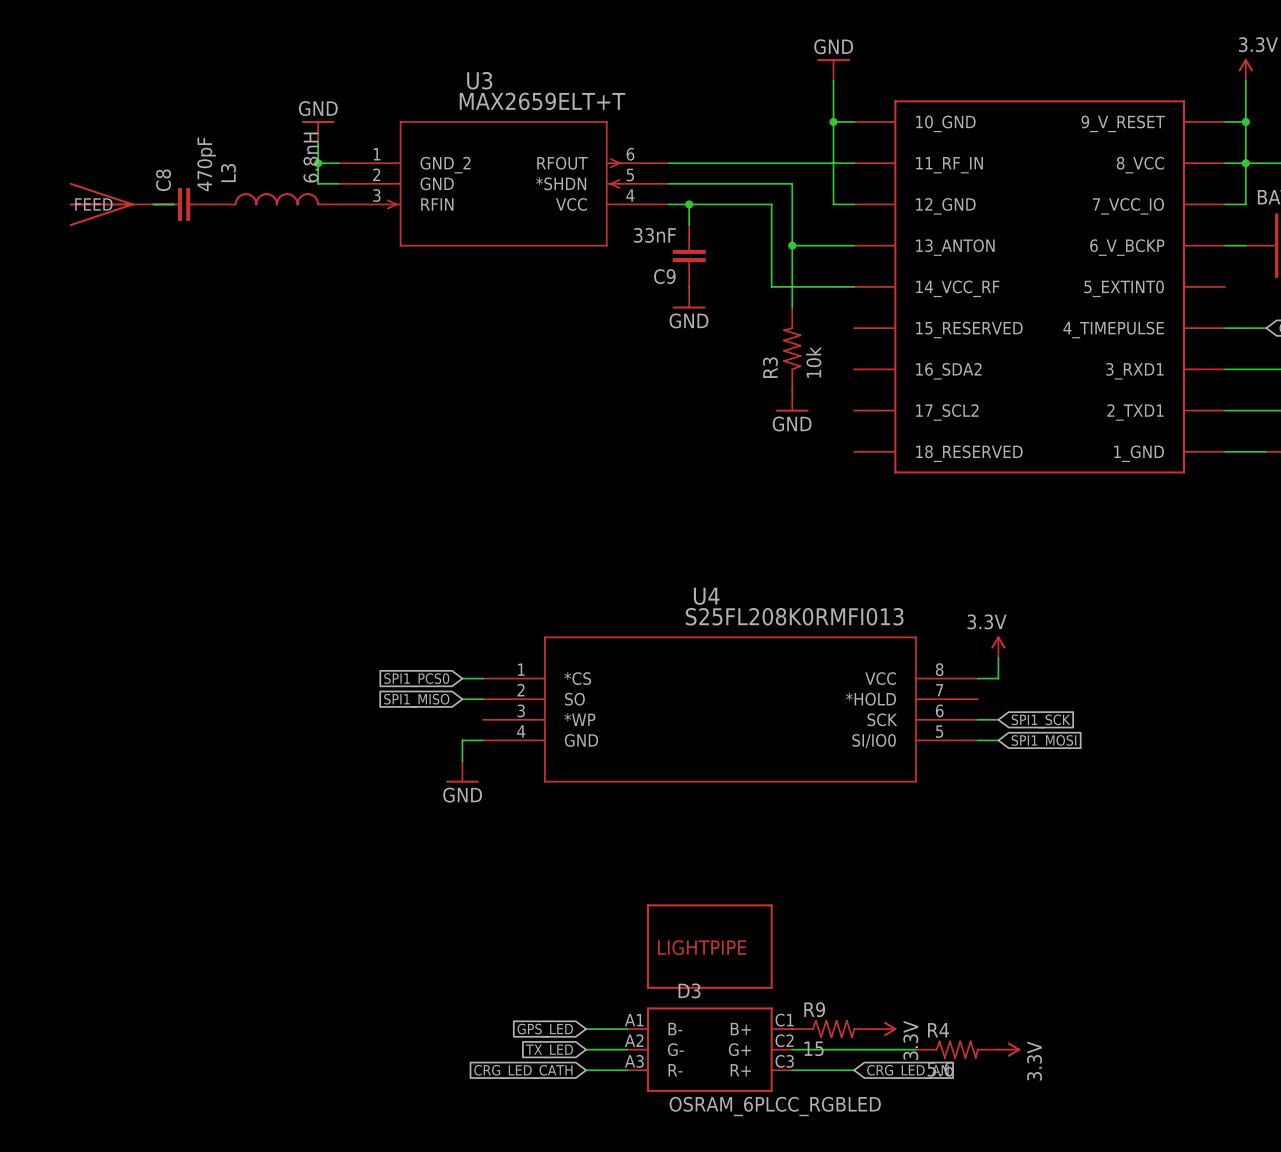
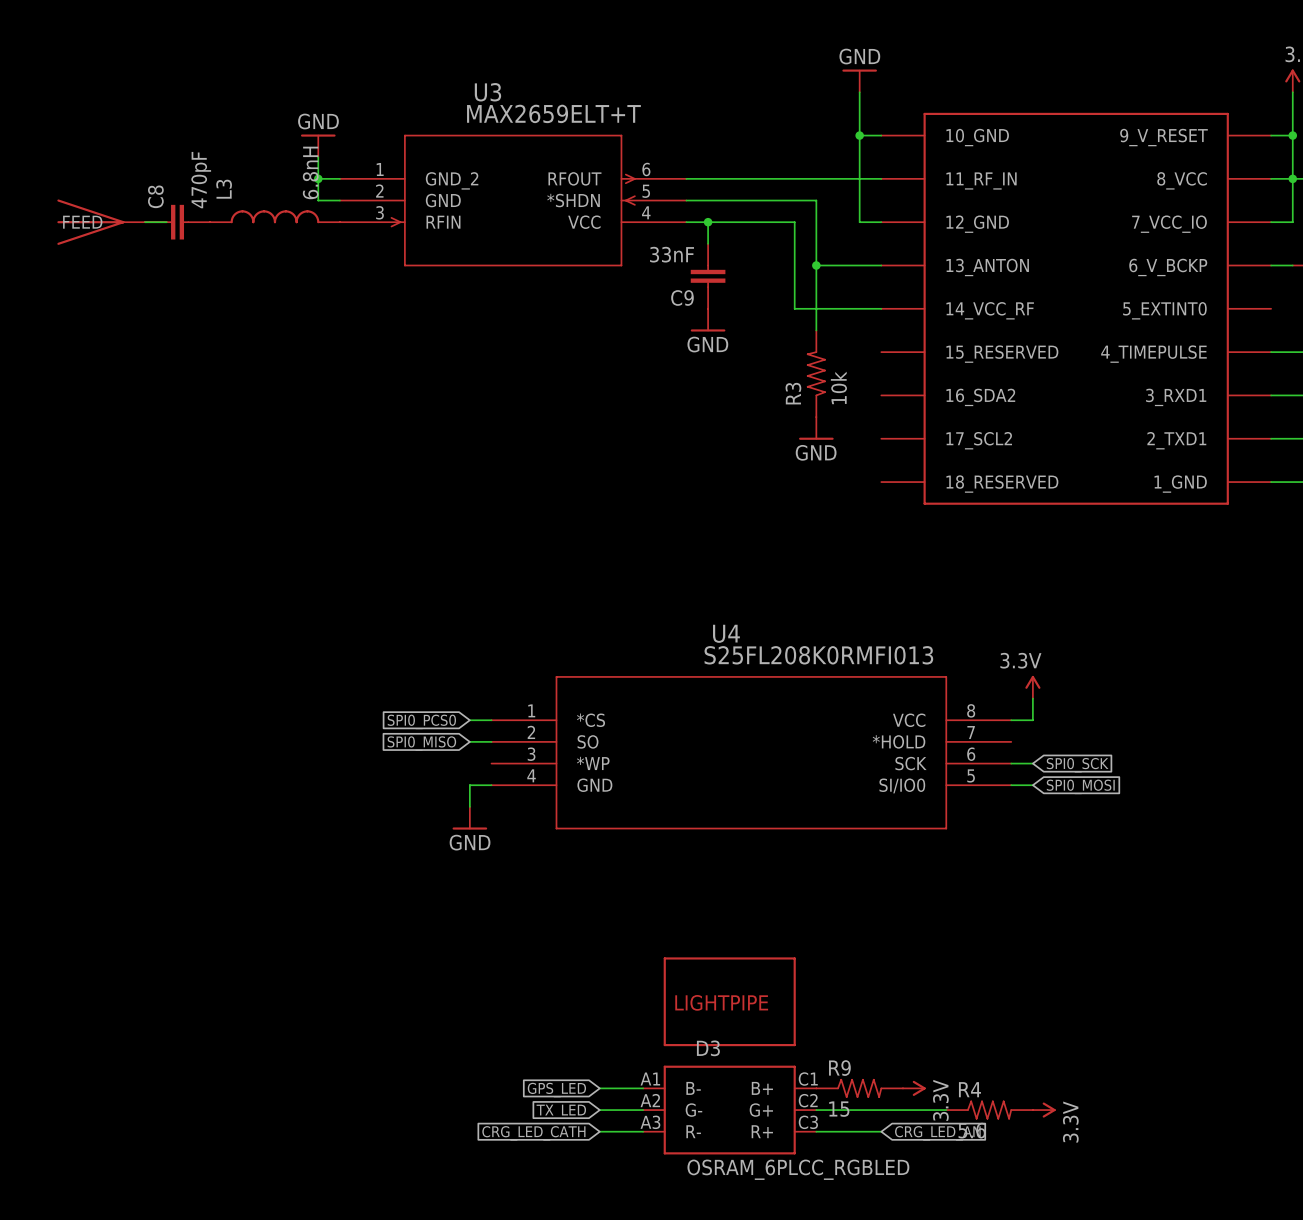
global label: SPI1_PCS0 (416, 680) -> SPI0_PCS0 (421, 721)
global label: SPI1_MISO (416, 700) -> SPI0_MISO (421, 743)
global label: SPI1_SCK (1040, 721) -> SPI0_SCK (1077, 765)
global label: SPI1_MOSI (1043, 742) -> SPI0_MOSI (1080, 786)

